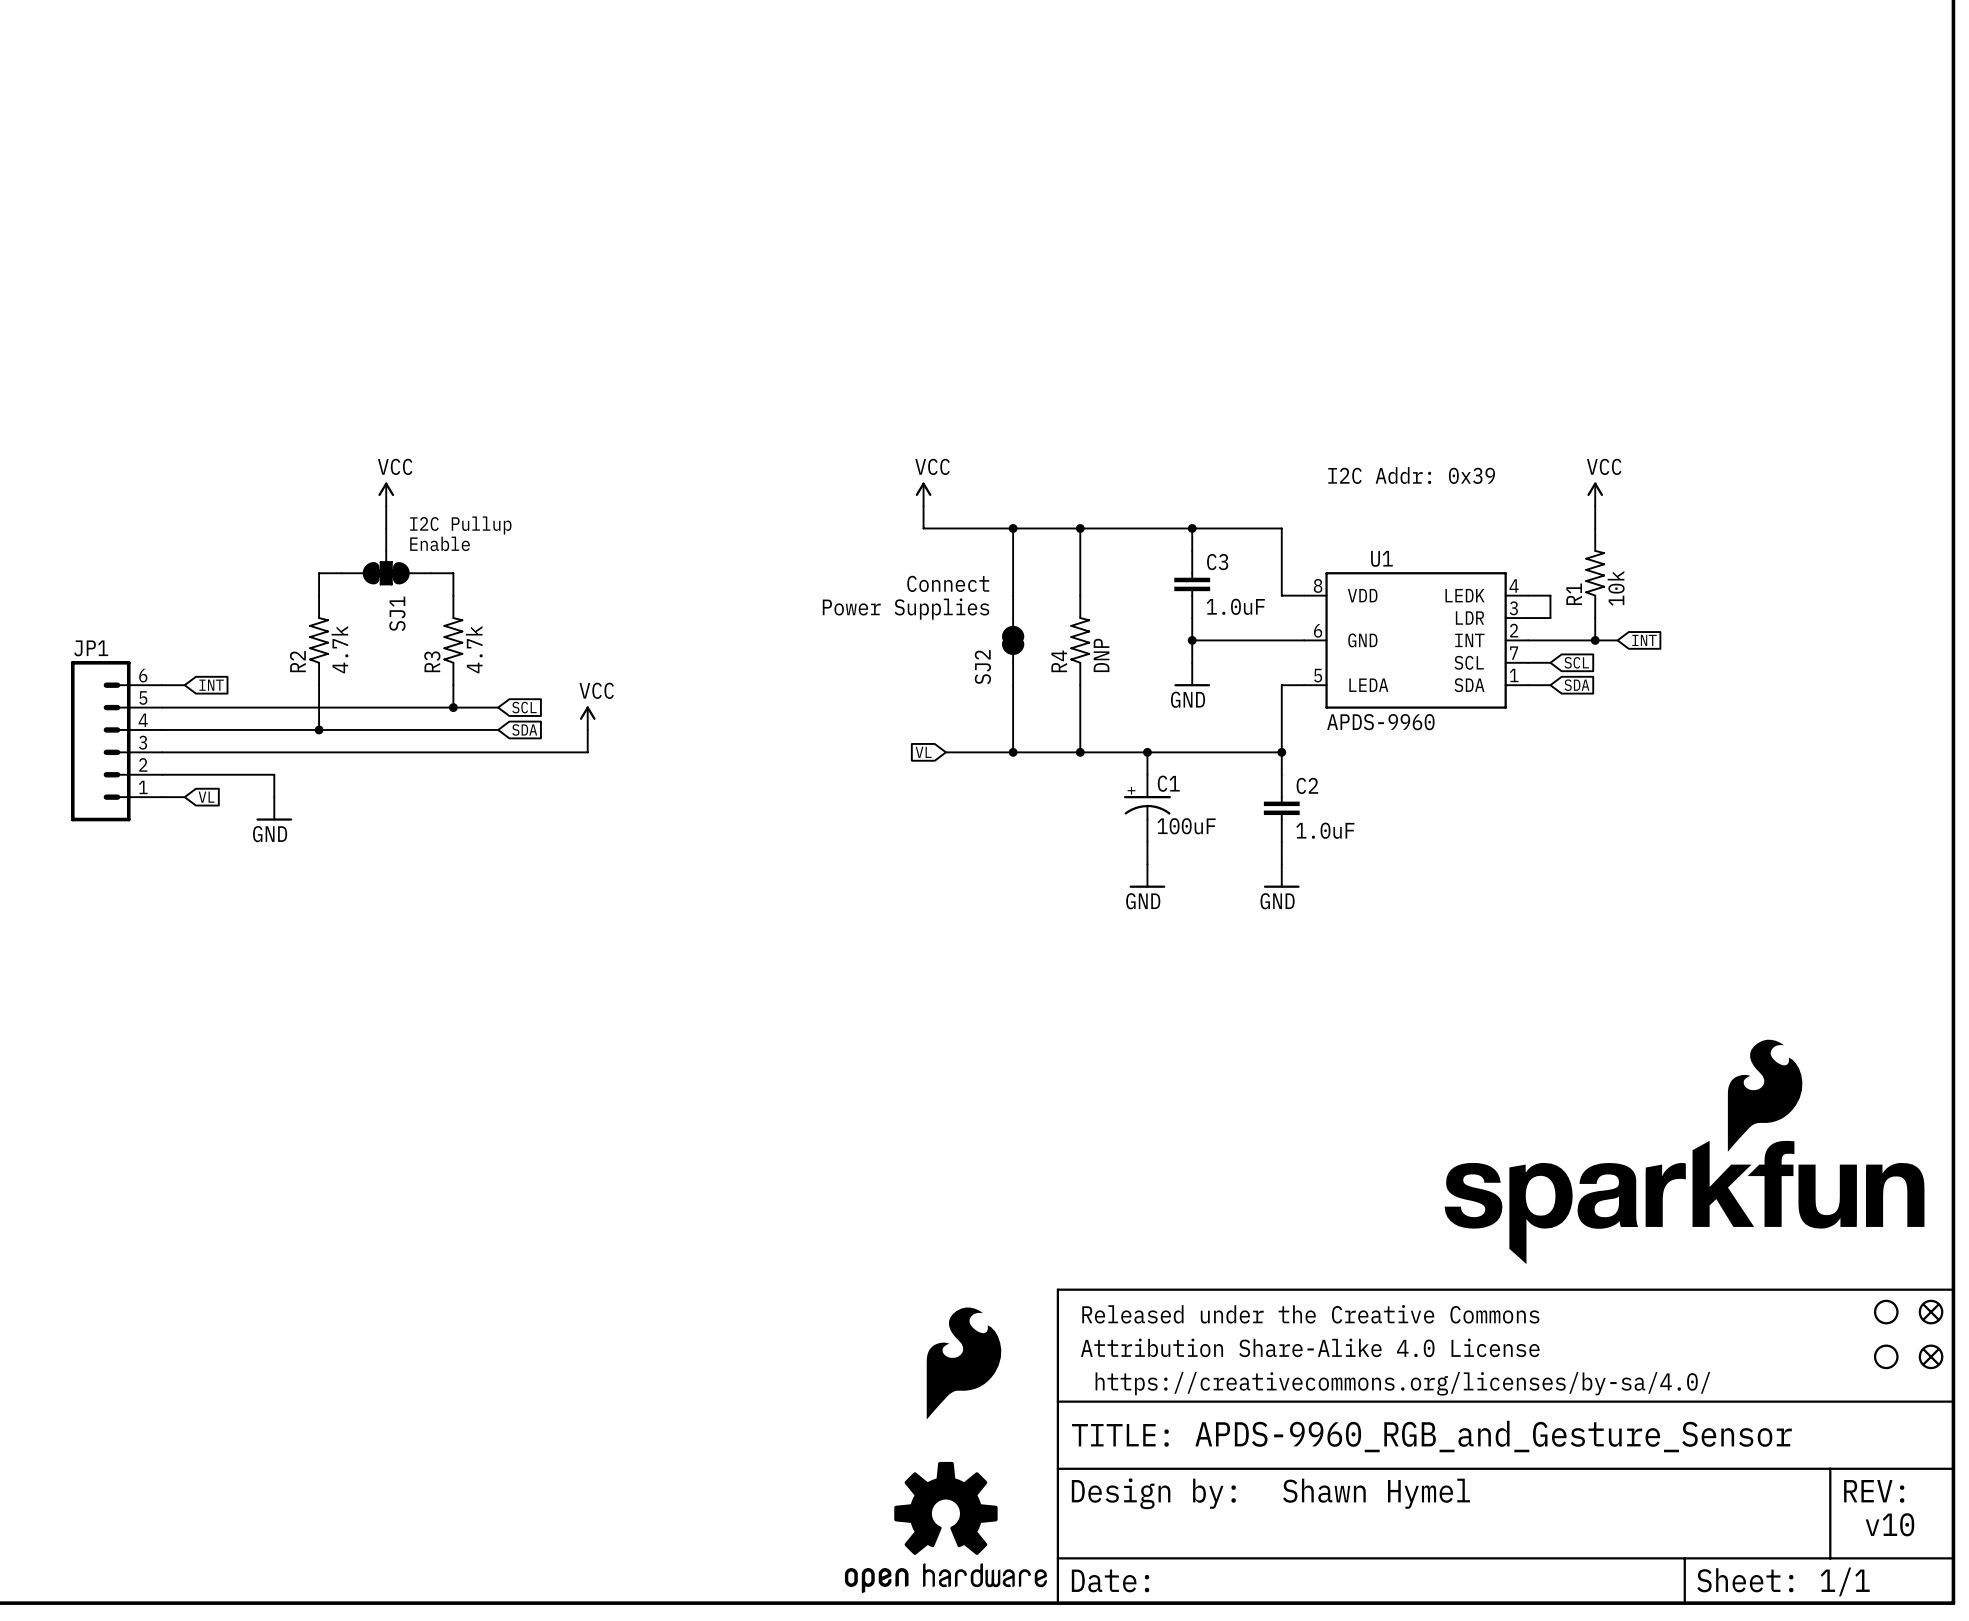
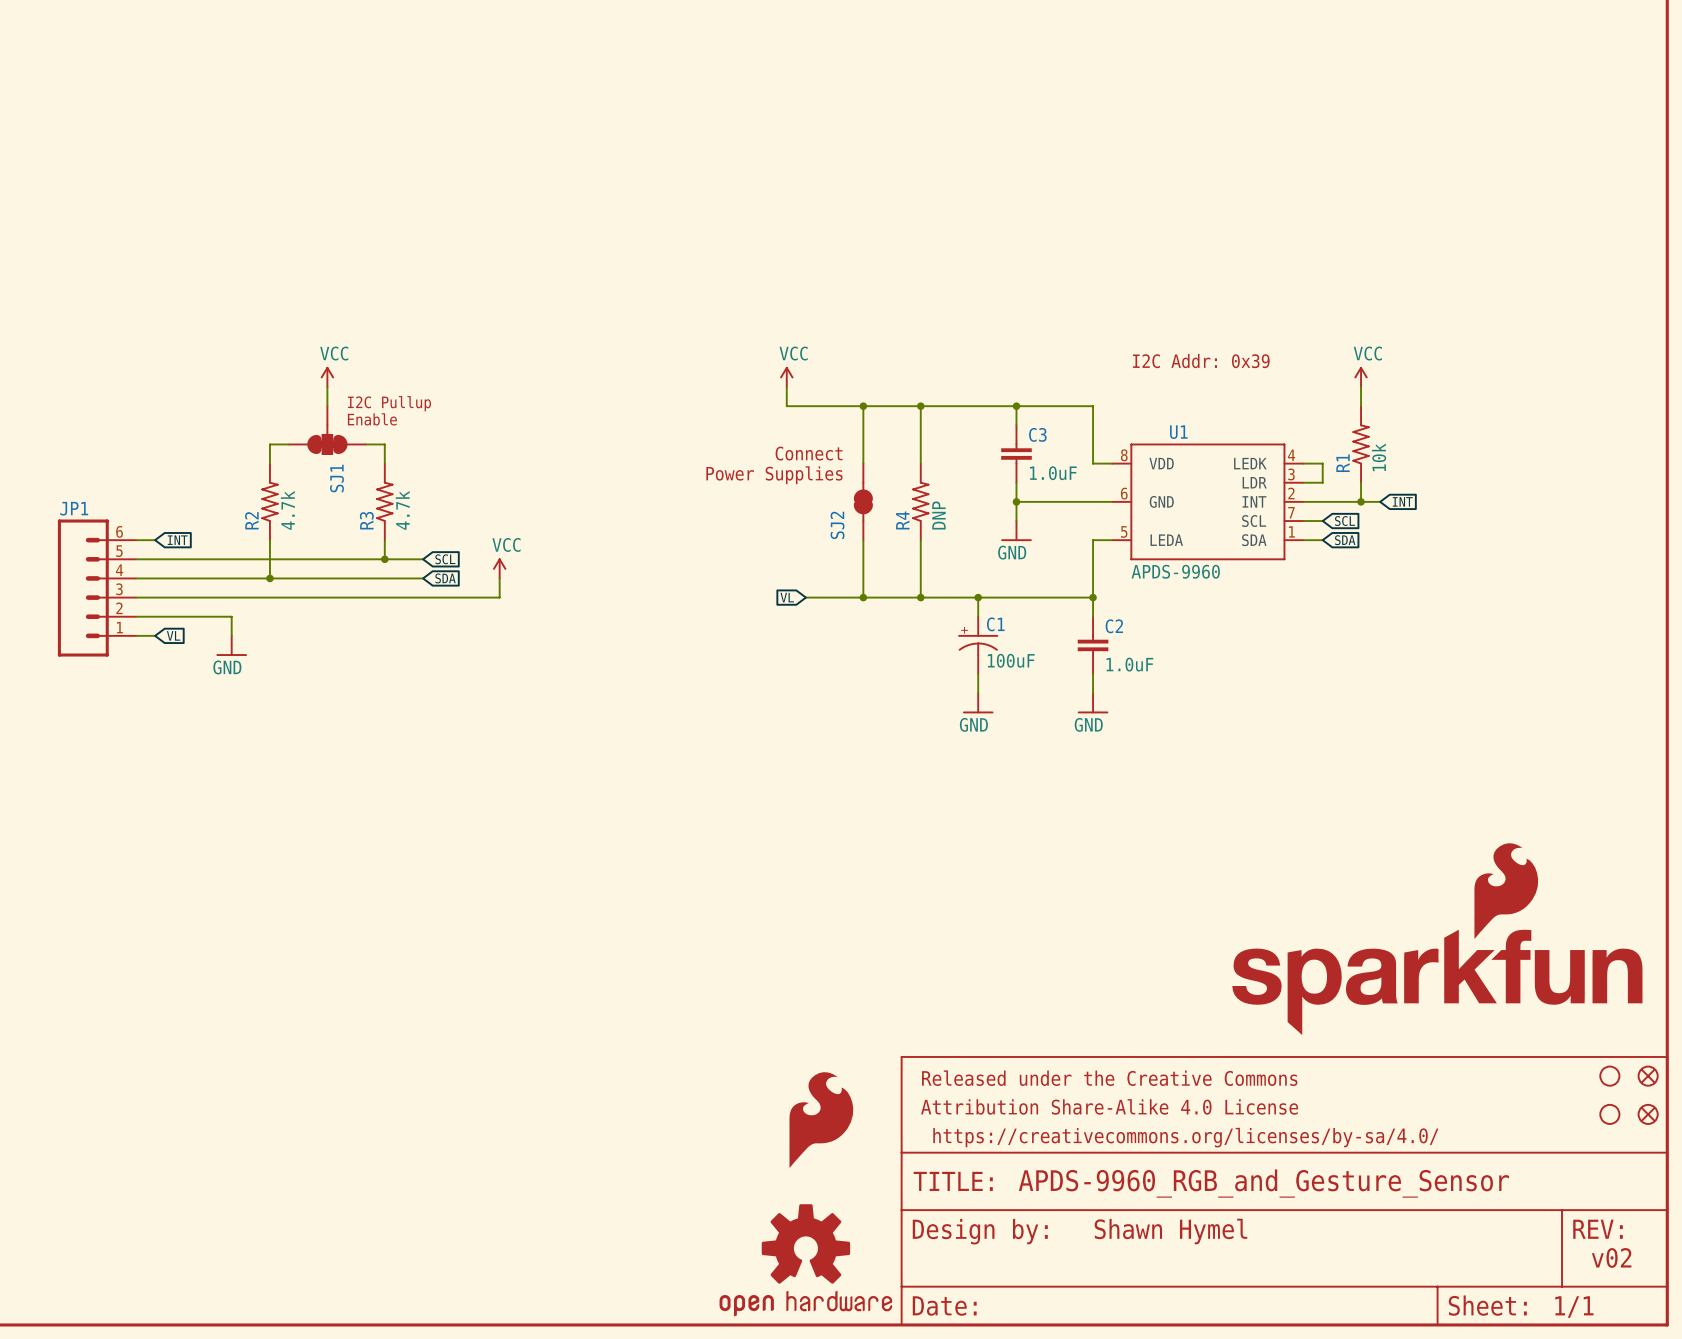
text: v10 (1889, 1524) -> v02 (1611, 1257)

